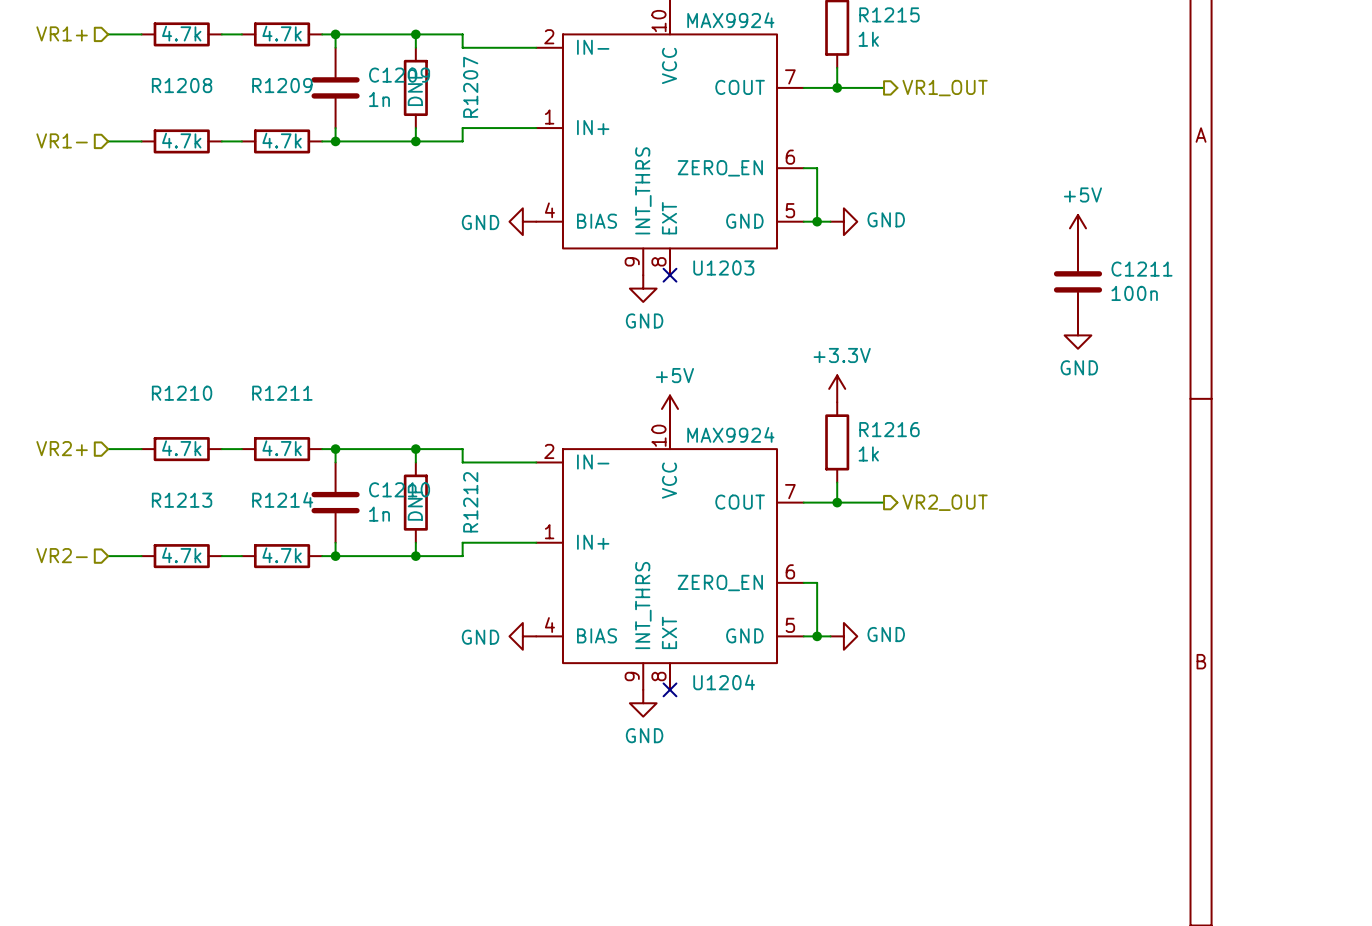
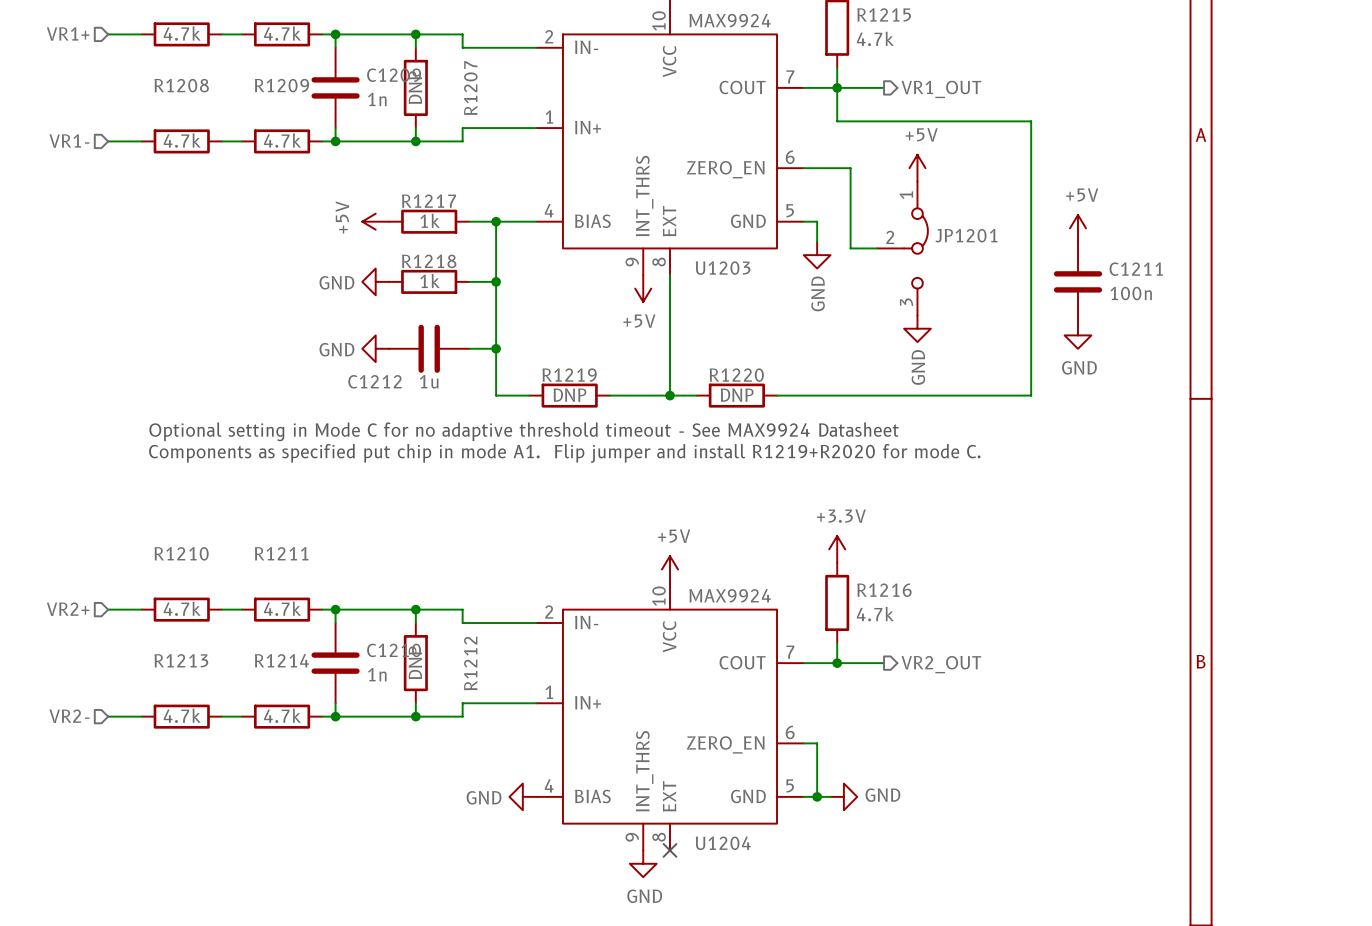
R1215 value: 1k (868, 39) -> 4.7k (875, 38)
wire: none -> (837, 87) (837, 121) (1031, 121) (1031, 395) (777, 395)
wire: (817, 168) (817, 221) (830, 221) -> (817, 168) (850, 168) (850, 248) (877, 248)
power symbol: none -> +5V (917, 168)
power symbol: none -> +5V (375, 221)
R1217: none -> 1k (429, 221)
wire: none -> (469, 221) (536, 221)
wire: none -> (496, 221) (496, 395) (529, 395)
junction: none -> (496, 221)
power symbol: GND (522, 221) -> none
wire: none -> (817, 221) (817, 241)
junction: (817, 221) -> none
power symbol rotation: 0° (843, 221) -> 90° clockwise (817, 255)
power symbol position: GND (843, 221) -> GND (817, 255)
JP1201: none -> (902, 248)
wire: none -> (670, 275) (670, 395)
no-connect mark: (670, 275) -> none
power symbol: none -> GND (375, 281)
R1218: none -> 1k (429, 281)
wire: none -> (469, 281) (496, 281)
junction: none -> (496, 281)
power symbol: GND (643, 288) -> +5V (643, 288)
power symbol: none -> GND (917, 328)
power symbol: none -> GND (375, 348)
C1212: none -> 1u (429, 348)
wire: none -> (469, 348) (496, 348)
junction: none -> (496, 348)
power symbol position: +3.3V (837, 388) -> +3.3V (837, 549)
R1219: none -> DNP (569, 395)
wire: none -> (609, 395) (696, 395)
junction: none -> (670, 395)
R1220: none -> DNP (736, 395)
power symbol position: +5V (670, 408) -> +5V (670, 569)
text: none -> Optional setting in Mode C for no adaptive threshold timeout - See MAX9924 Datasheet (524, 431)
R1216 position: (837, 442) -> (837, 602)
hierarchical label position: VR2+ (62, 448) -> VR2+ (68, 609)
wire: (108, 449) (141, 449) -> (108, 609) (141, 609)
R1210 position: (181, 449) -> (181, 609)
wire: (221, 449) (241, 449) -> (221, 609) (241, 609)
R1211 position: (282, 449) -> (282, 609)
wire: (322, 449) (462, 449) (462, 462) (536, 462) -> (322, 609) (462, 609) (462, 623) (536, 623)
wire: (335, 449) (335, 462) -> (335, 609) (335, 623)
junction: (335, 449) -> none
wire: (415, 449) (415, 462) -> (415, 609) (415, 623)
junction: (415, 449) -> none
text: none -> Components as specified put chip in mode A1. Flip jumper and install R1219+R2020 for mode C. (564, 453)
R1216 value: 1k (868, 453) -> 4.7k (875, 614)
wire: (837, 482) (837, 502) -> (837, 643) (837, 663)
C1210 position: (335, 502) -> (335, 663)
R1212 position: (415, 502) -> (415, 663)
wire: (803, 502) (884, 502) -> (803, 663) (884, 663)
junction: (837, 502) -> none
hierarchical label position: VR2_OUT (945, 502) -> VR2_OUT (941, 664)
wire: (335, 542) (335, 556) -> (335, 703) (335, 716)
wire: (415, 542) (415, 556) -> (415, 703) (415, 716)
wire: (536, 542) (462, 542) (462, 556) (322, 556) -> (536, 703) (462, 703) (462, 716) (322, 716)
hierarchical label position: VR2- (62, 555) -> VR2- (69, 716)
wire: (108, 556) (141, 556) -> (108, 716) (141, 716)
R1213 position: (181, 556) -> (181, 716)
wire: (221, 556) (241, 556) -> (221, 716) (241, 716)
R1214 position: (282, 556) -> (282, 716)
junction: (335, 556) -> none
junction: (415, 556) -> none
U1204 position: (670, 556) -> (670, 716)
wire: (803, 582) (817, 582) (817, 636) -> (803, 743) (817, 743) (817, 796)
junction: none -> (335, 609)
junction: none -> (415, 609)
power symbol: GND (522, 636) -> none
wire: (803, 636) (830, 636) -> (803, 796) (830, 796)
junction position: (817, 636) -> (837, 663)
power symbol: GND (843, 636) -> none
no-connect mark: (670, 689) -> none
power symbol: GND (643, 703) -> none
junction: none -> (335, 716)
junction: none -> (415, 716)
power symbol: none -> GND (522, 796)
junction: none -> (817, 796)
power symbol: none -> GND (843, 796)
no-connect mark: none -> (670, 850)
power symbol: none -> GND (643, 863)

